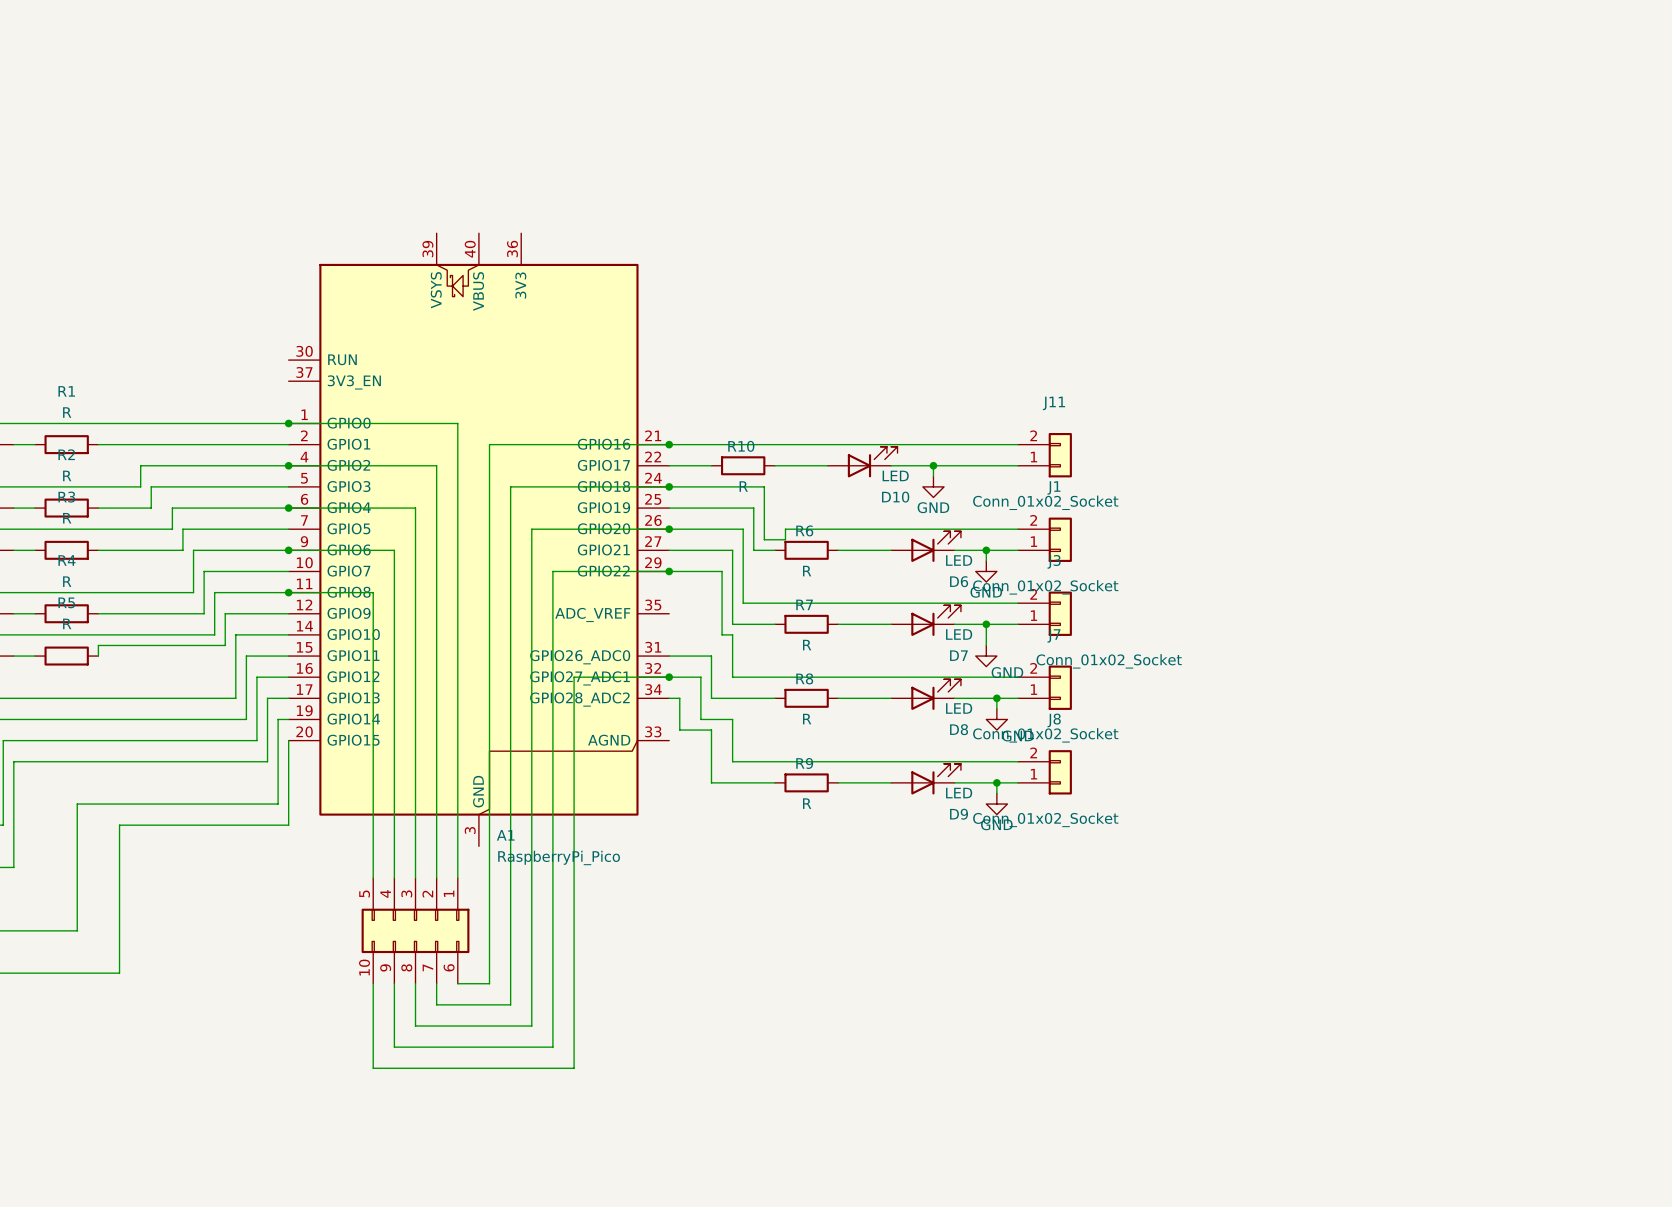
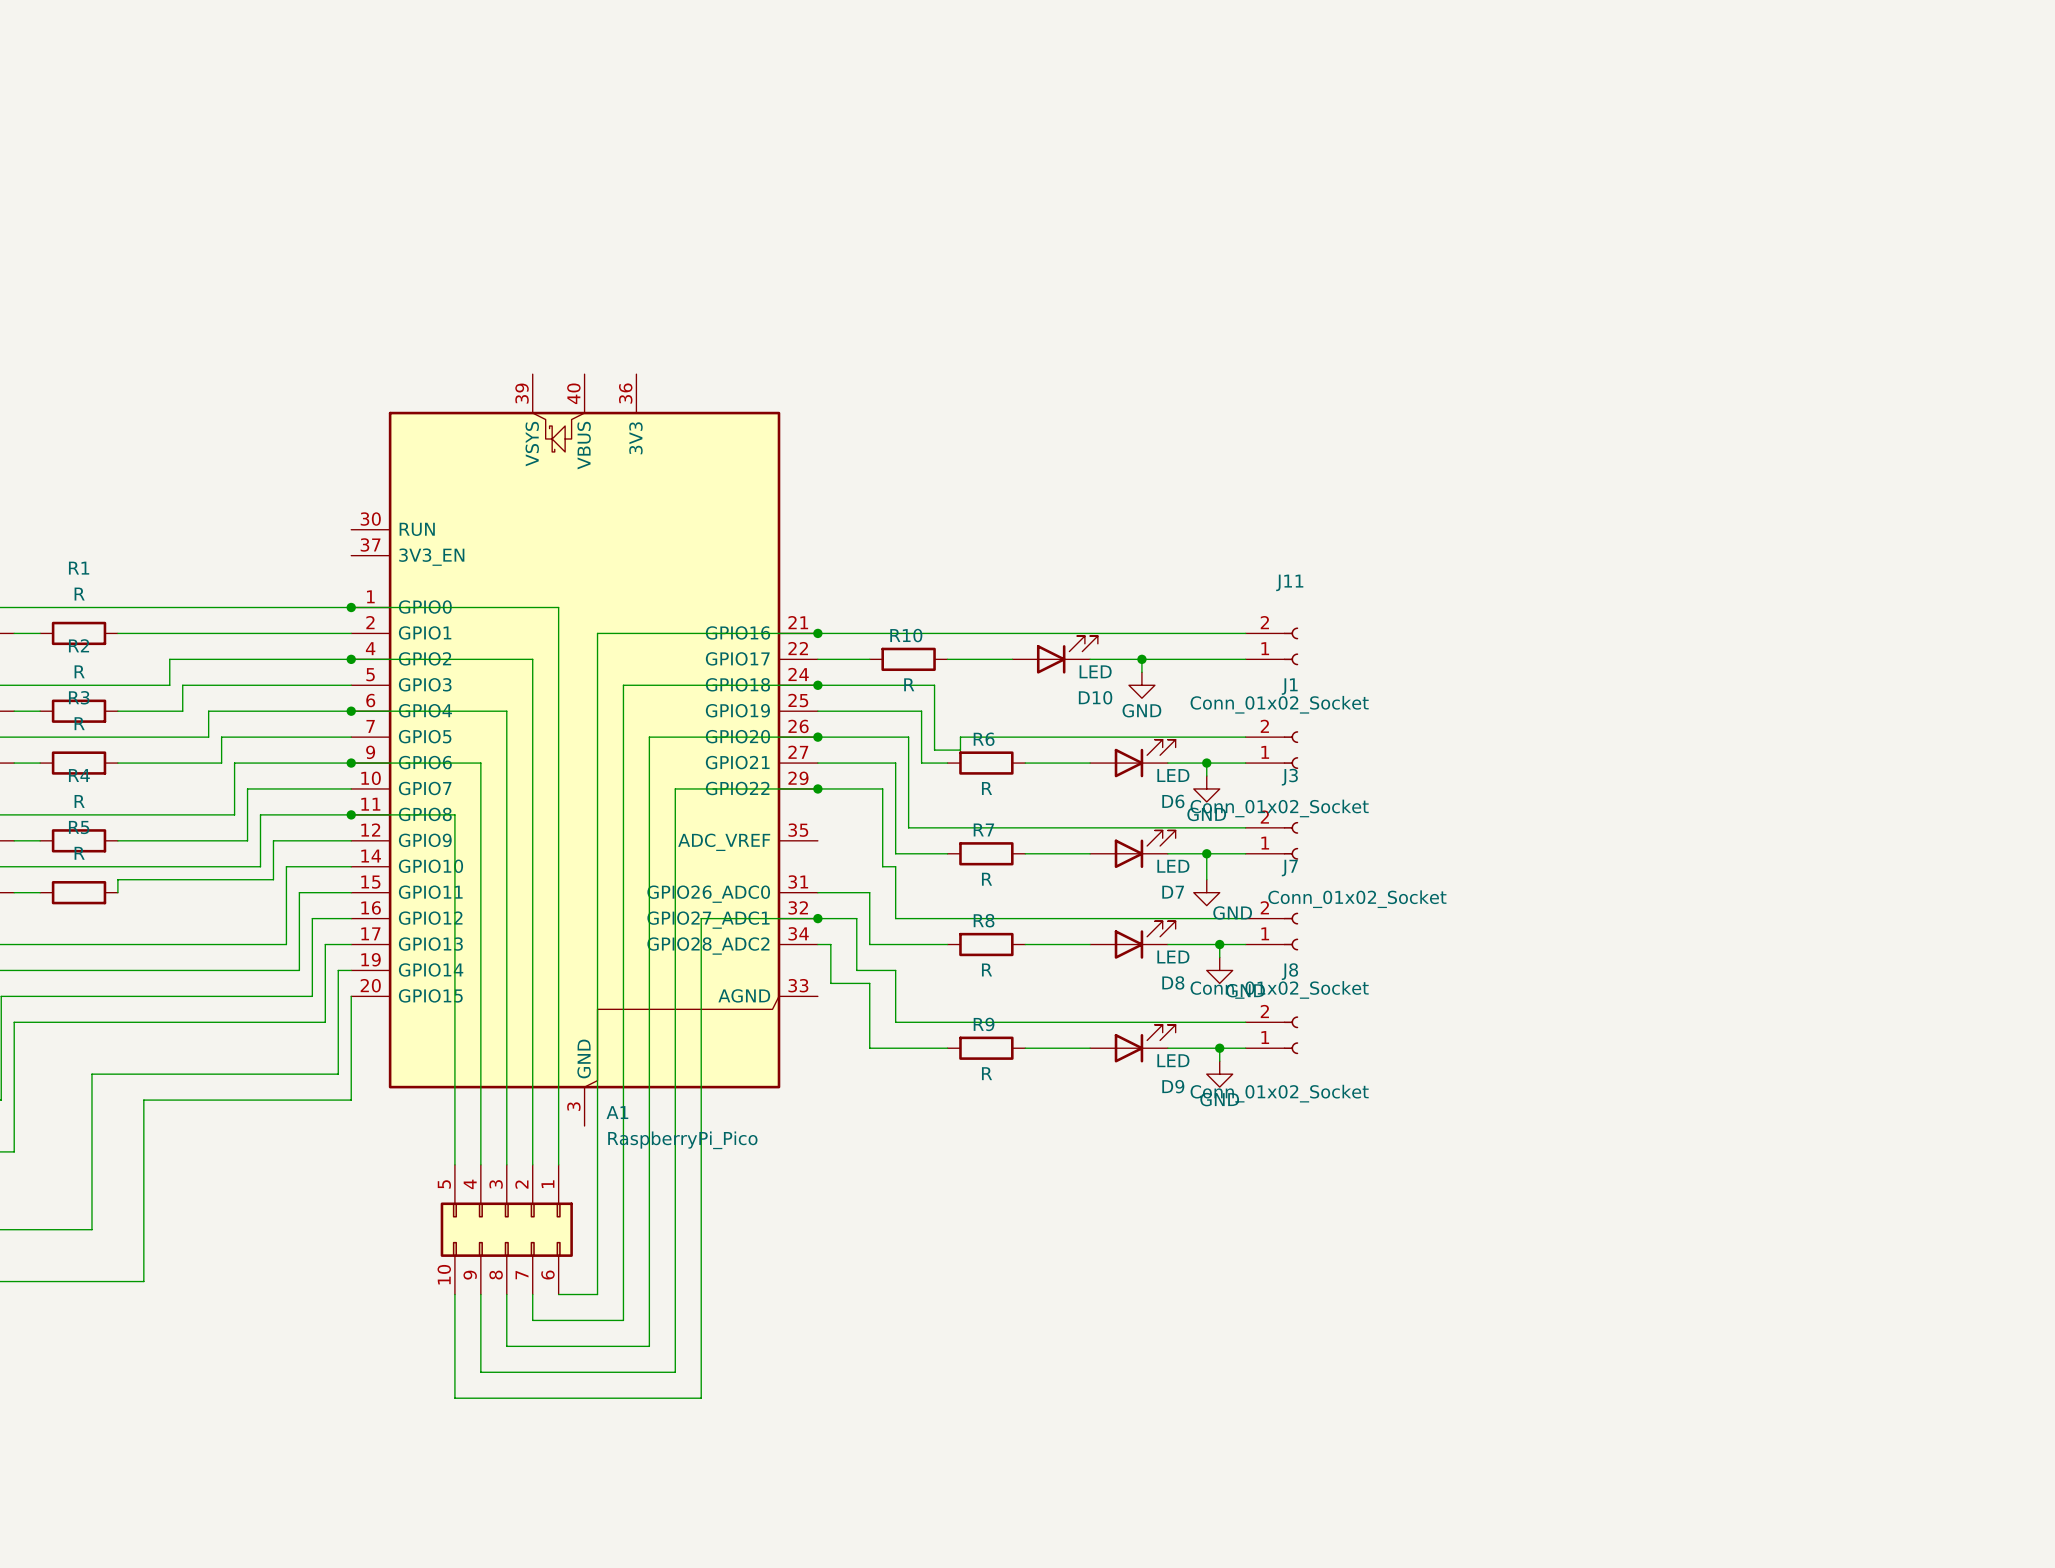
J11 symbol: [1018, 433, 1072, 478] -> [1245, 627, 1299, 666]
J1 symbol: [1018, 517, 1072, 562] -> [1245, 731, 1299, 770]
J3 symbol: [1018, 591, 1072, 636] -> [1245, 821, 1299, 860]
J7 symbol: [1018, 665, 1072, 710] -> [1245, 912, 1299, 951]
J8 symbol: [1018, 750, 1072, 795] -> [1245, 1016, 1299, 1055]

